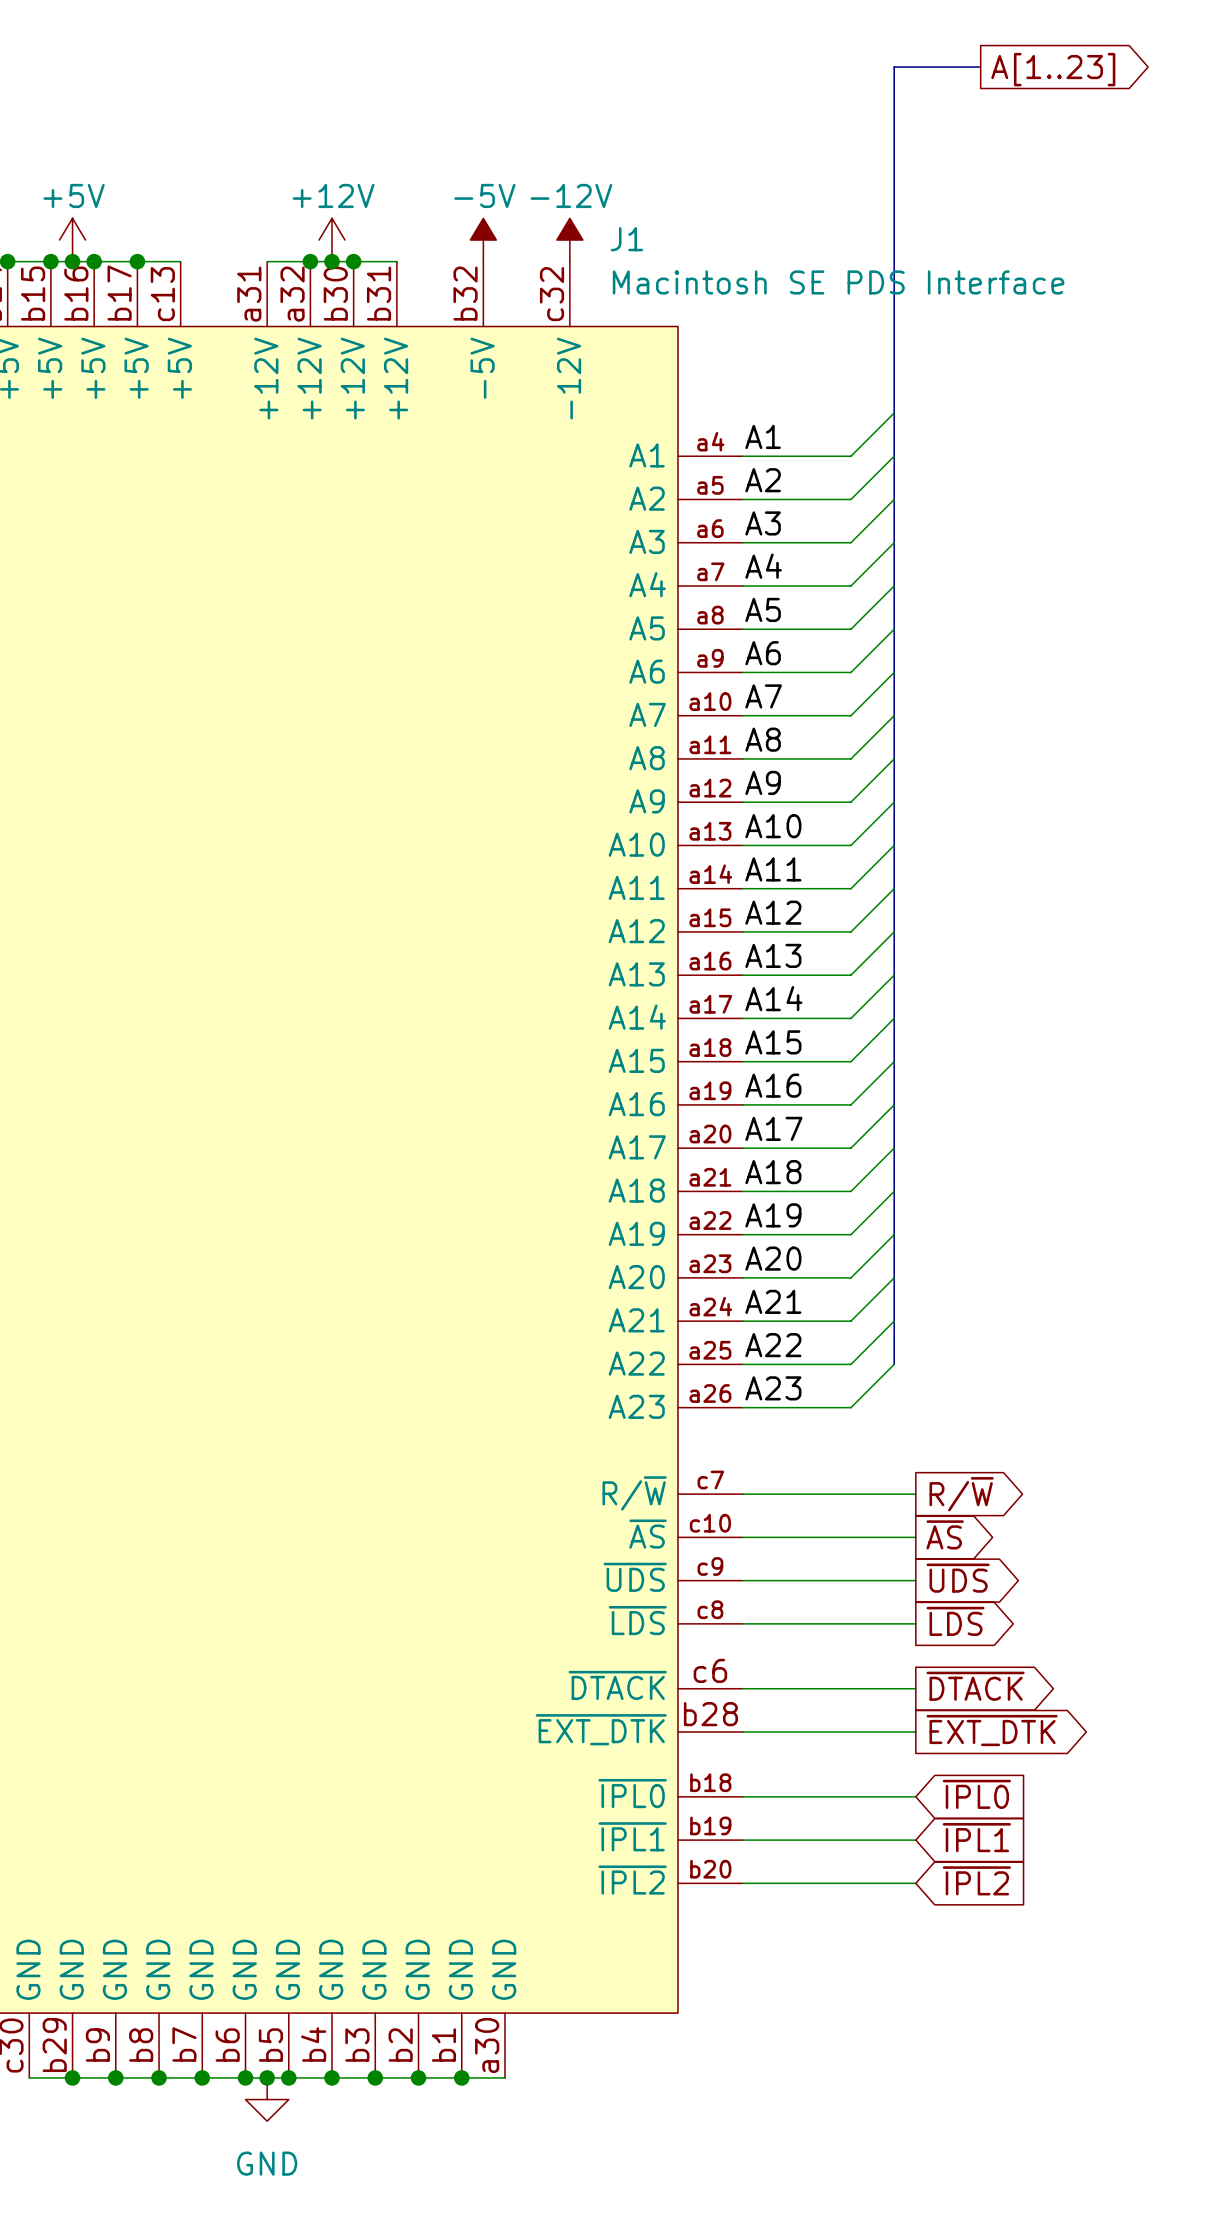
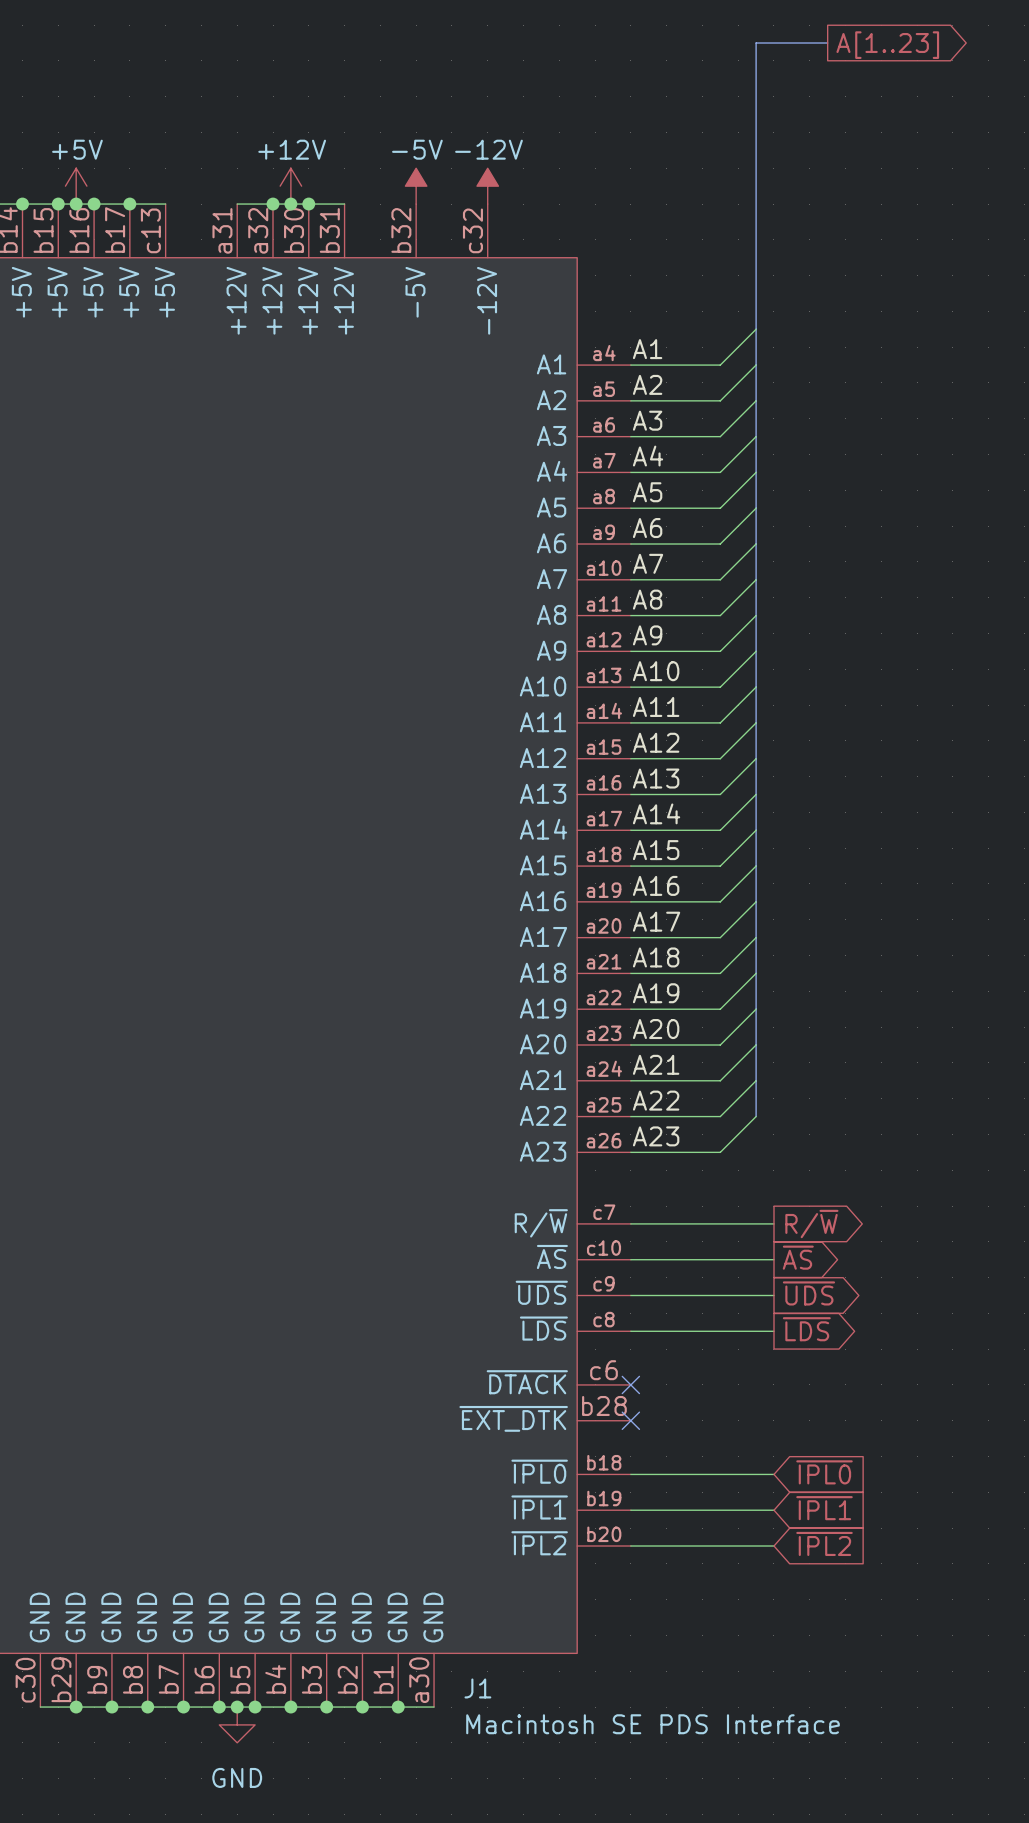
J1 name position: J1 (626, 239) -> J1 (477, 1688)
J1 value position: Macintosh SE PDS Interface (838, 282) -> Macintosh SE PDS Interface (653, 1724)
global label: ~{DTACK} (975, 1686) -> none
wire: (742, 1688) (915, 1688) -> none
no-connect mark: none -> (630, 1384)
global label: ~{EXT_DTK} (992, 1730) -> none
wire: (742, 1731) (915, 1731) -> none
no-connect mark: none -> (630, 1420)

